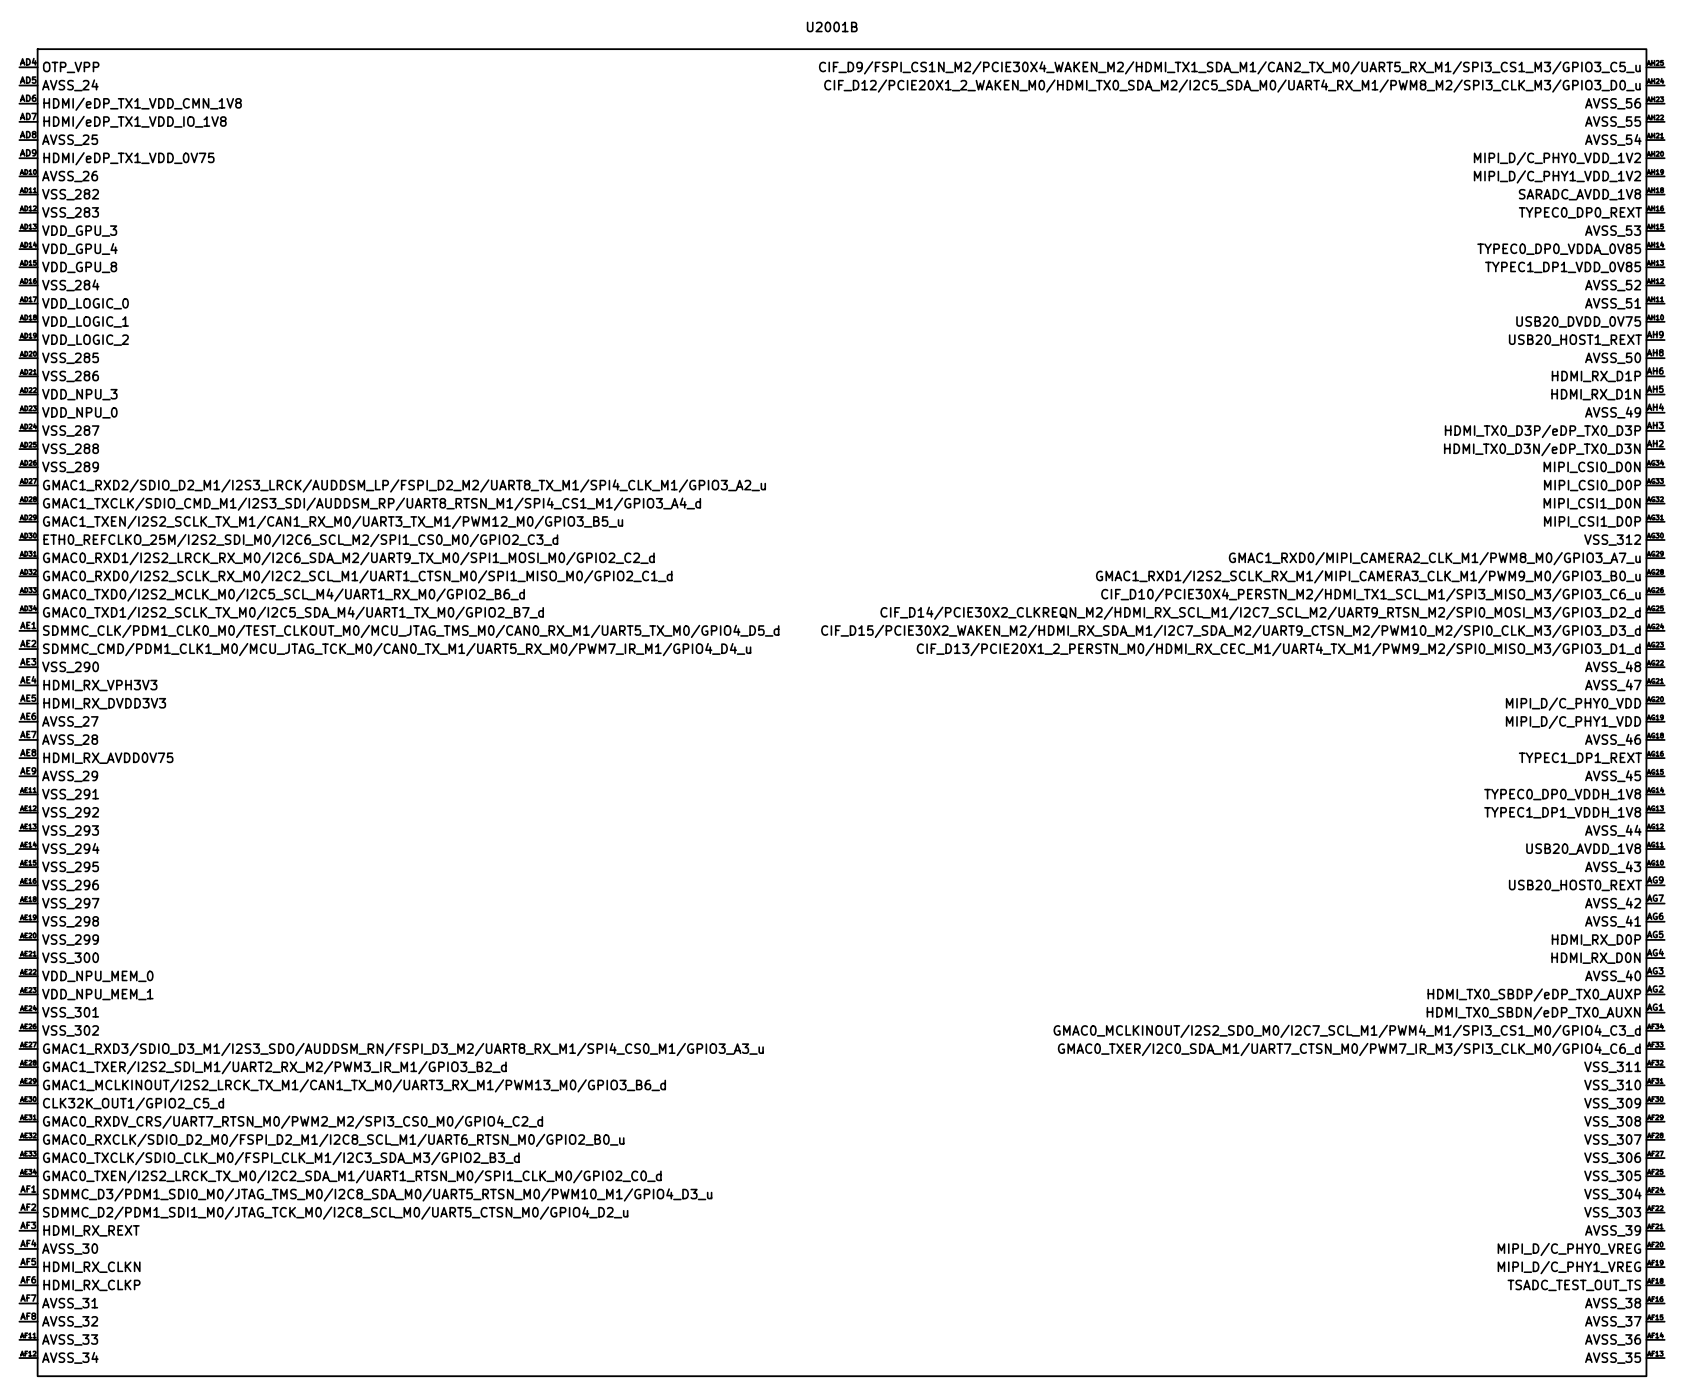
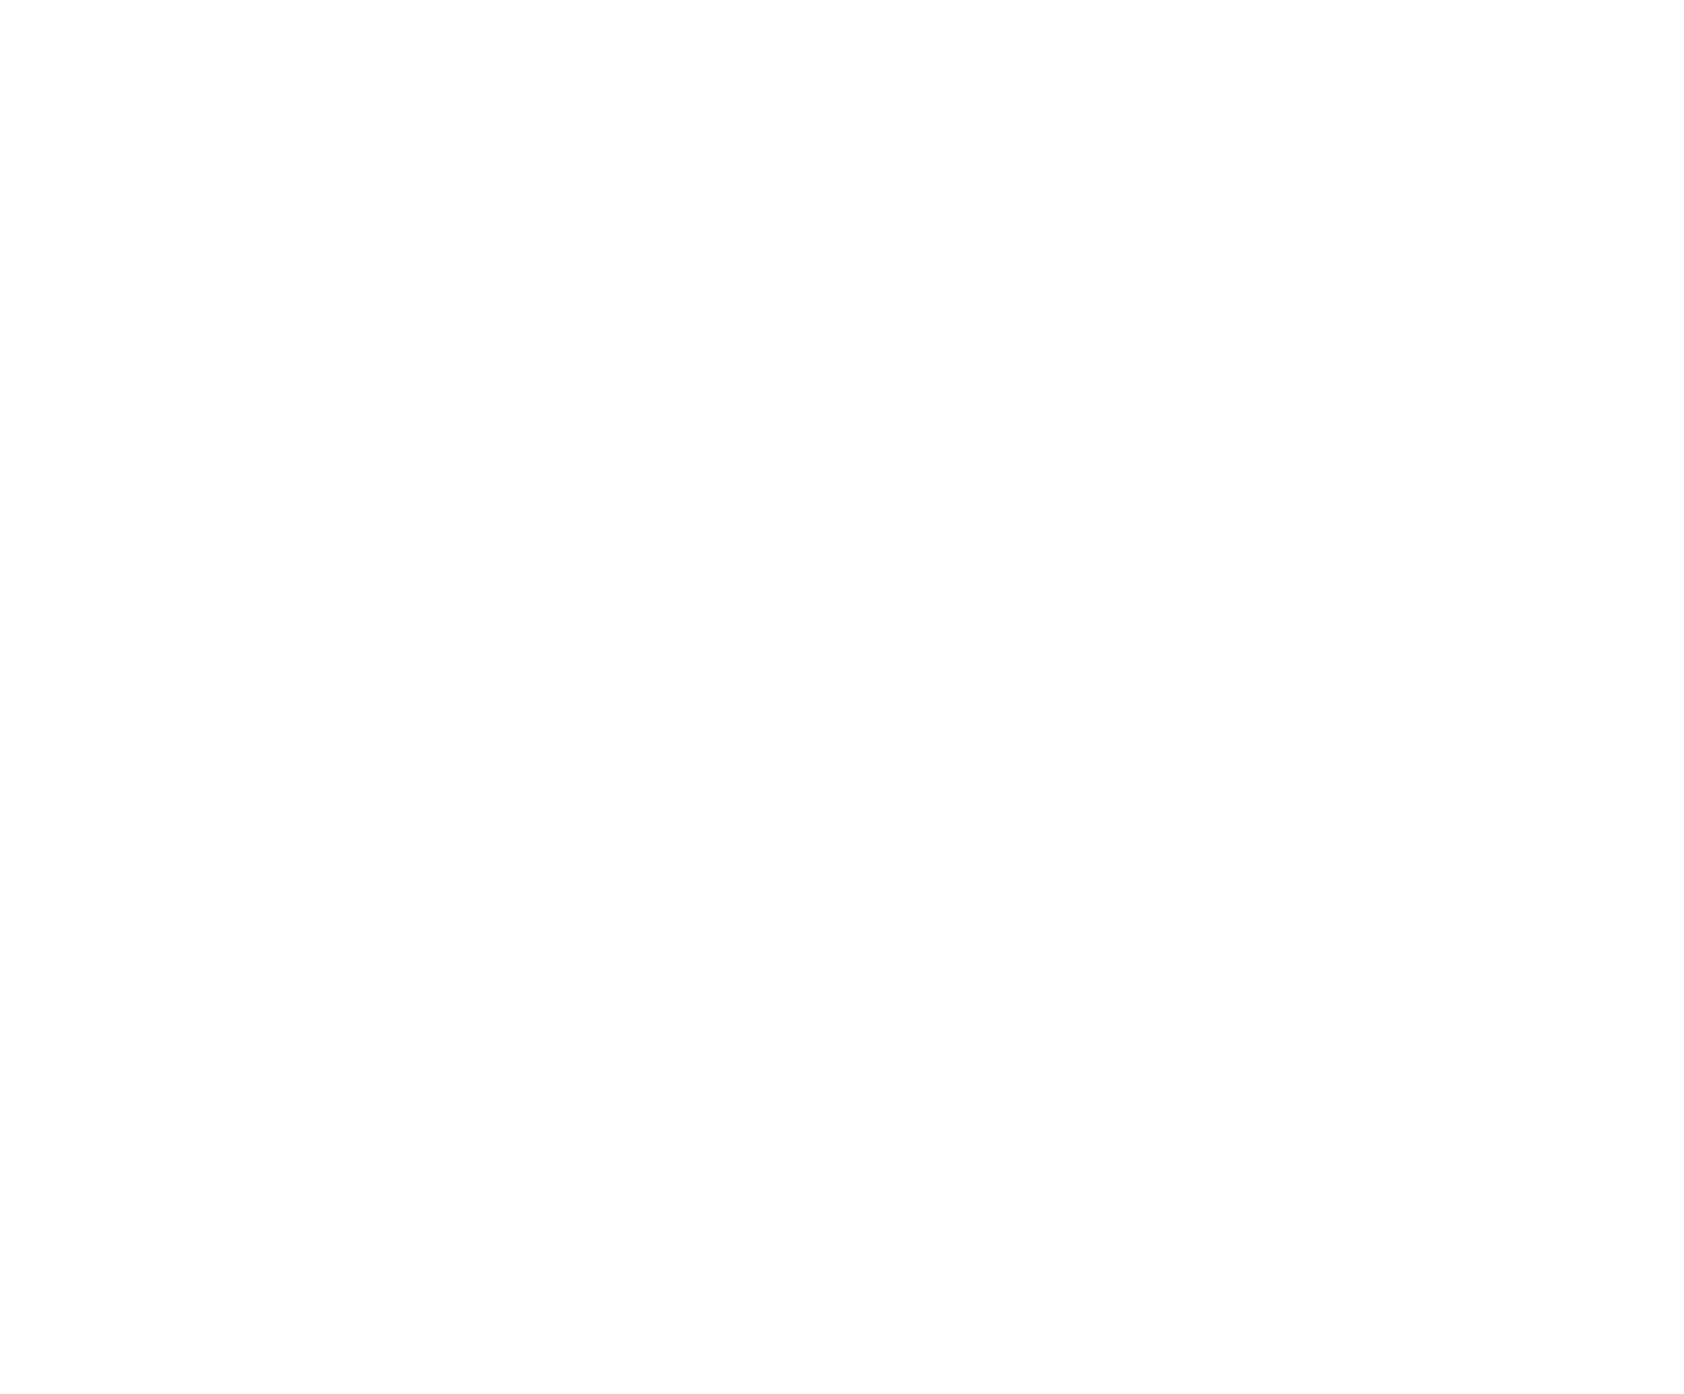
U2001B: (842, 712) -> none

